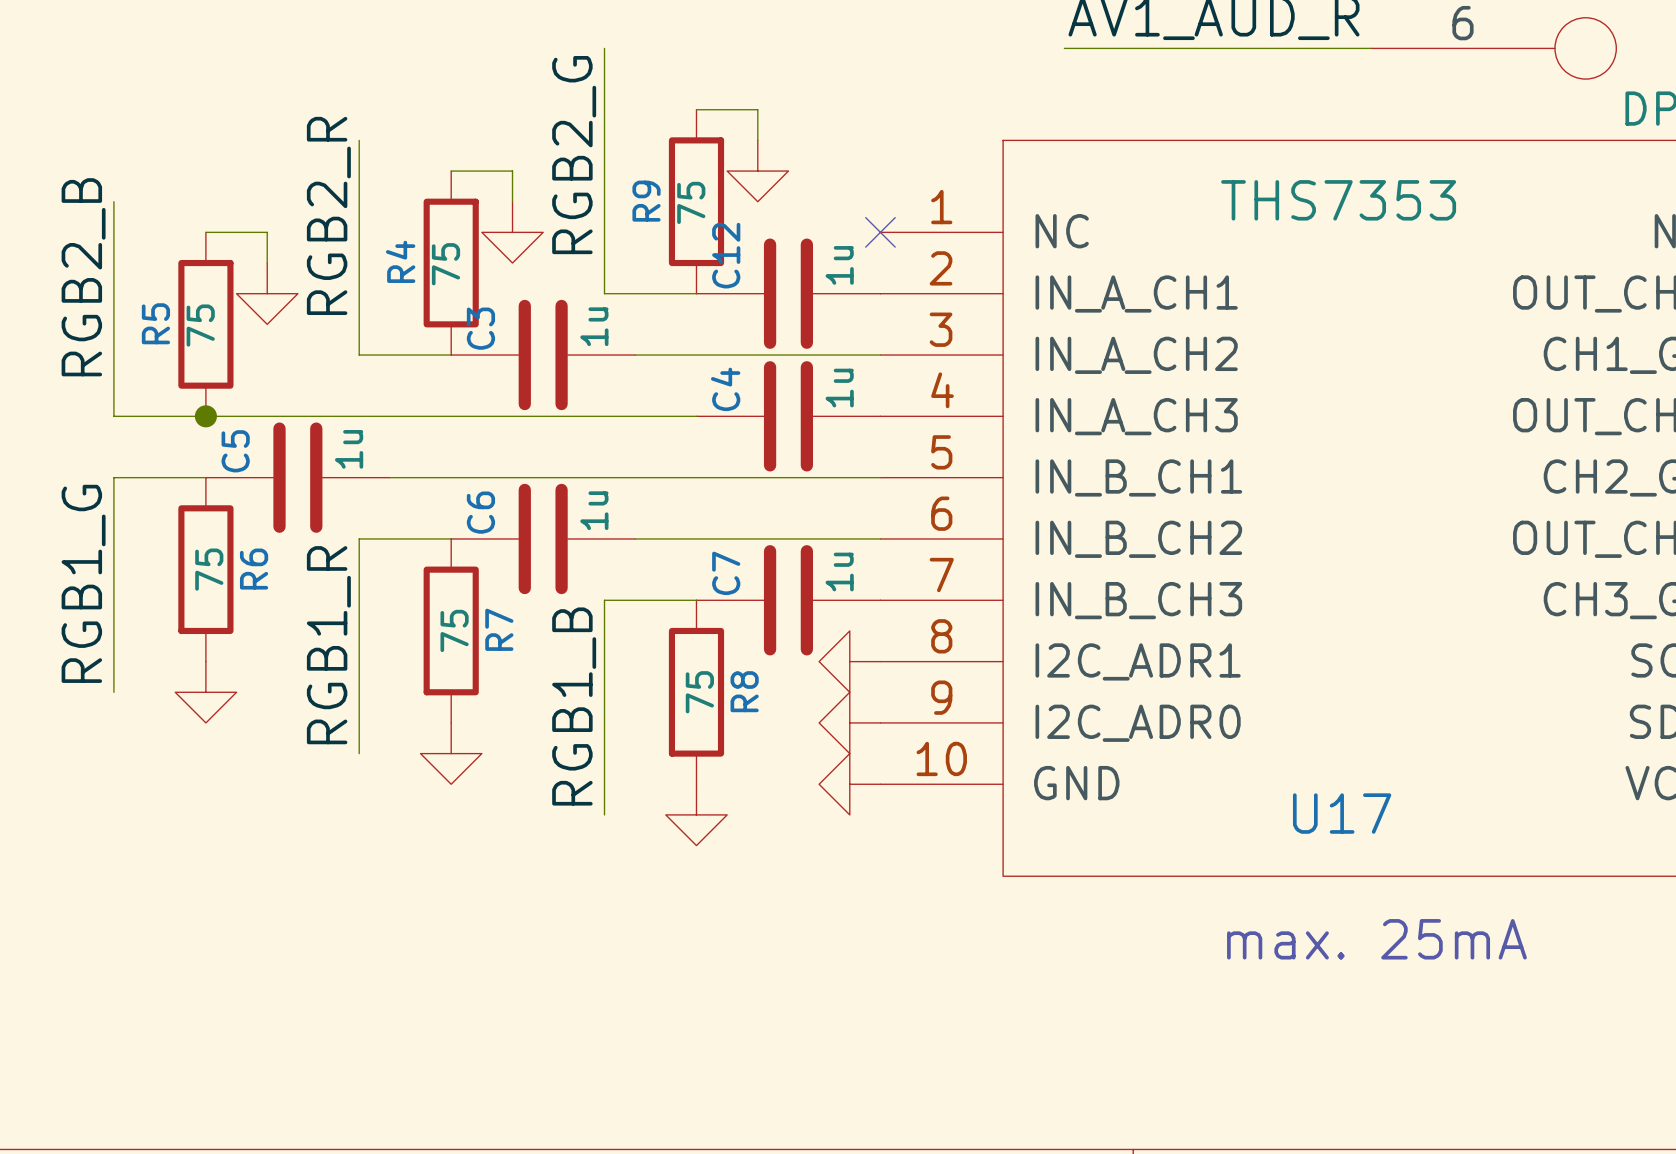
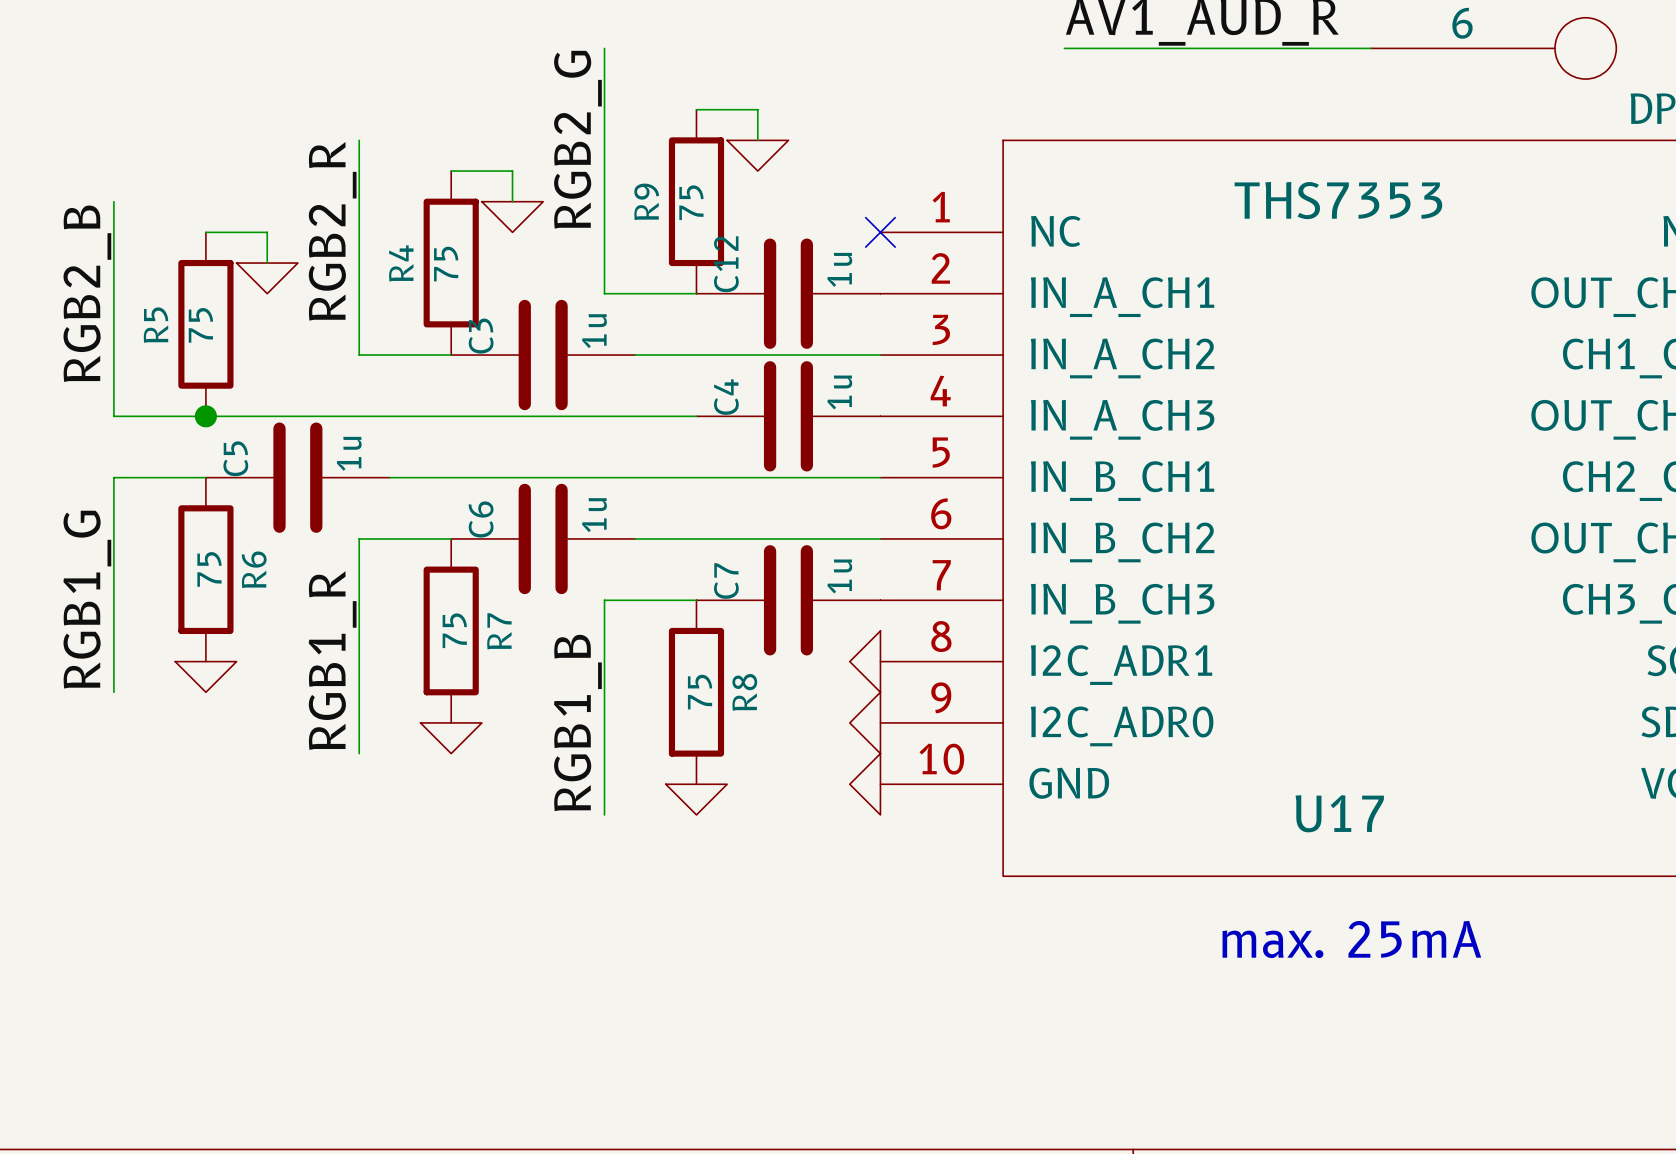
power symbol shape: [727, 140, 789, 202] -> [727, 140, 789, 172]
power symbol shape: [481, 201, 544, 264] -> [481, 201, 544, 233]
power symbol shape: [236, 263, 298, 325] -> [236, 263, 298, 294]
power symbol shape: [819, 630, 881, 693] -> [849, 630, 881, 693]
power symbol shape: [175, 661, 237, 723] -> [175, 661, 237, 693]
power symbol shape: [819, 692, 881, 754] -> [849, 692, 881, 754]
power symbol shape: [420, 722, 482, 785] -> [420, 722, 482, 754]
power symbol shape: [819, 753, 881, 815] -> [849, 753, 881, 815]
power symbol shape: [665, 784, 728, 846] -> [665, 784, 728, 815]

